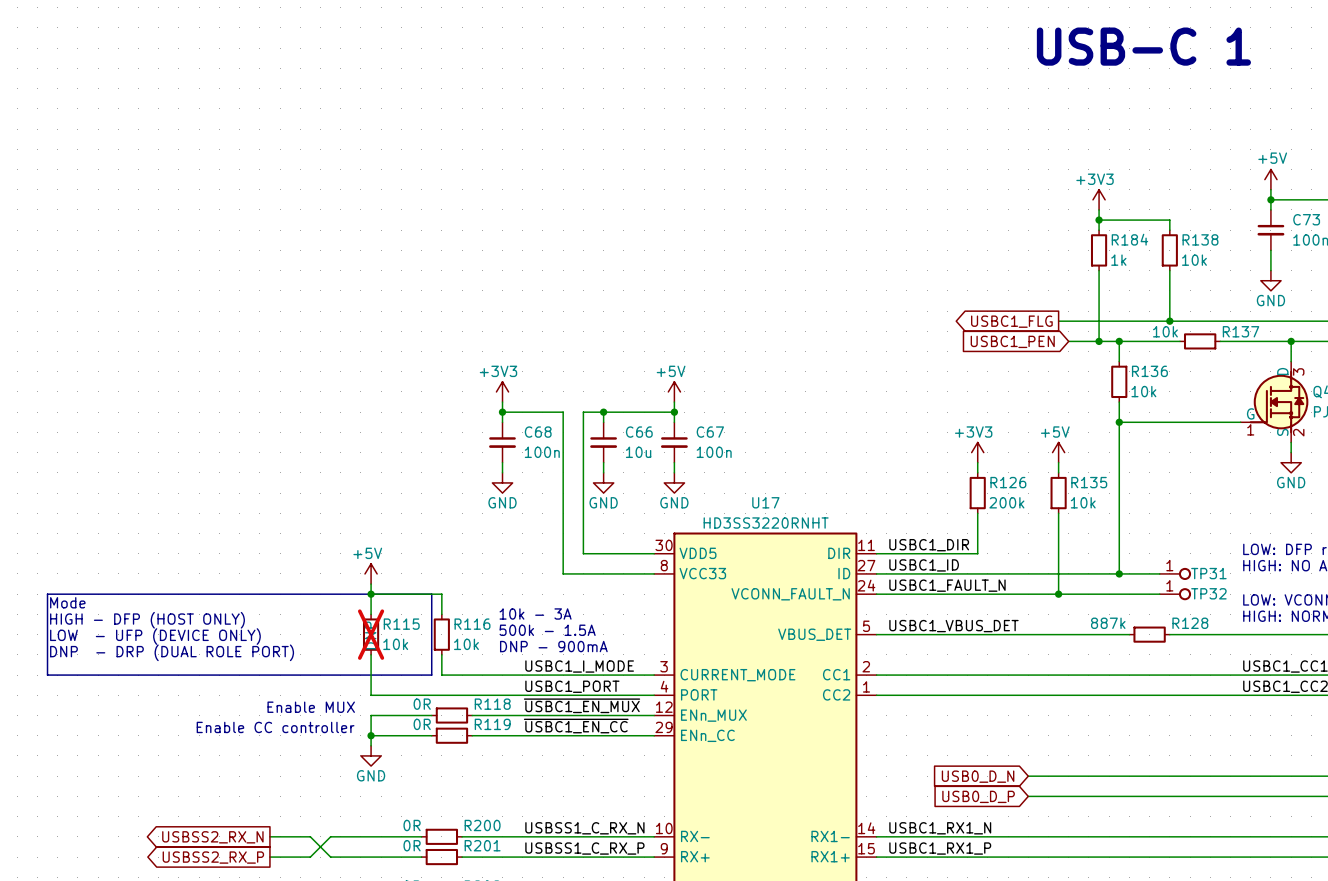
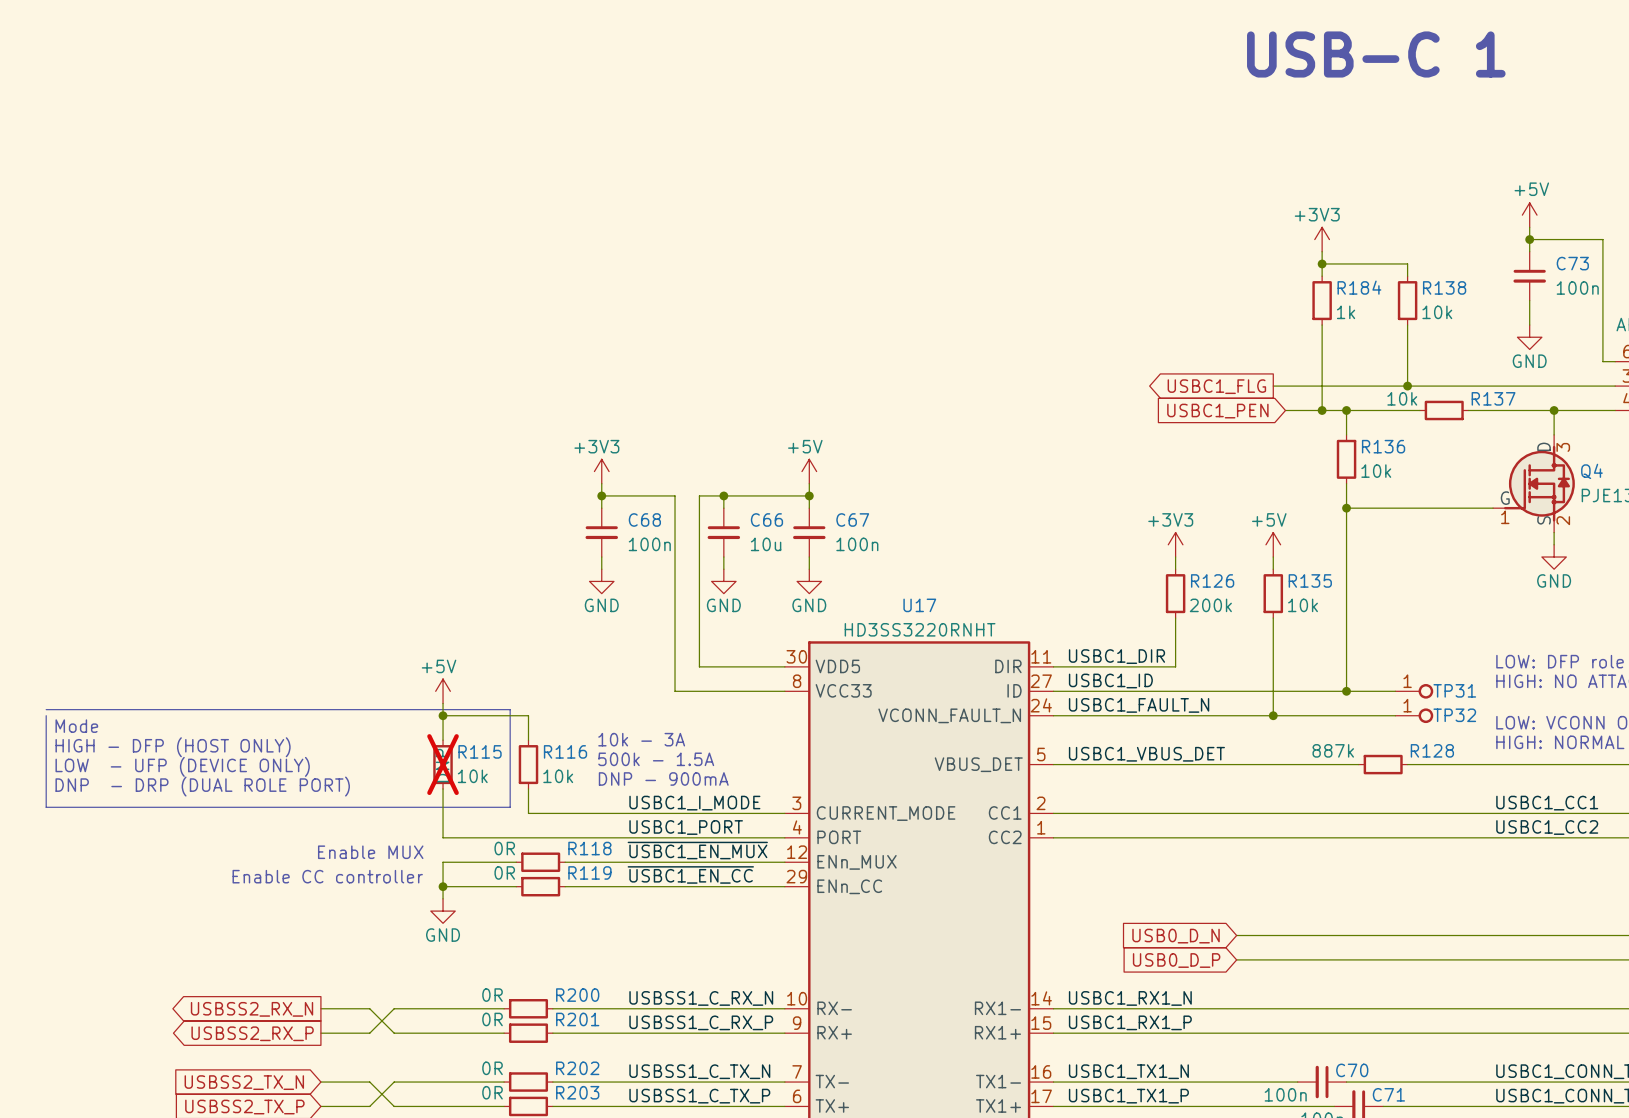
line: none -> (46, 709) (510, 709) (510, 807) (46, 807) (46, 715)
line: (47, 594) (47, 675) (431, 675) (431, 594) (47, 594) -> none

